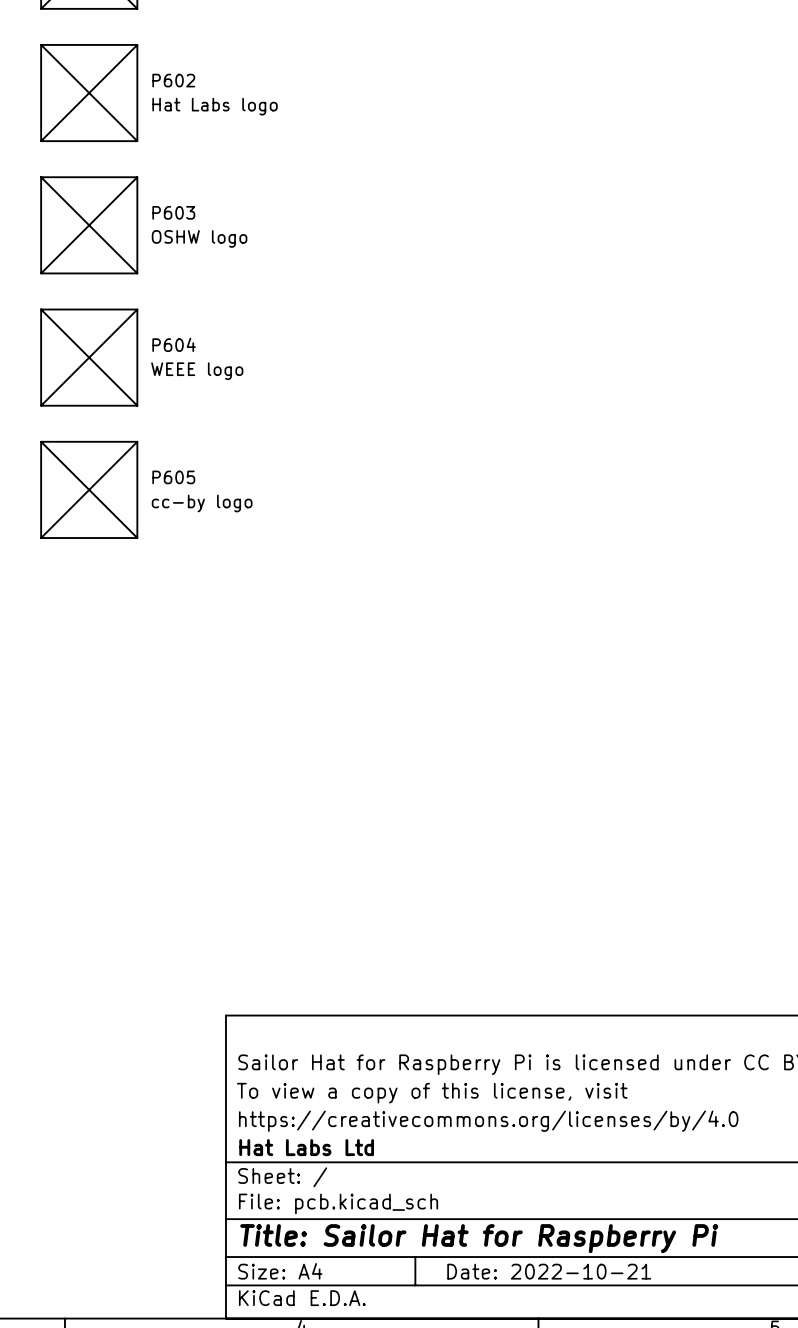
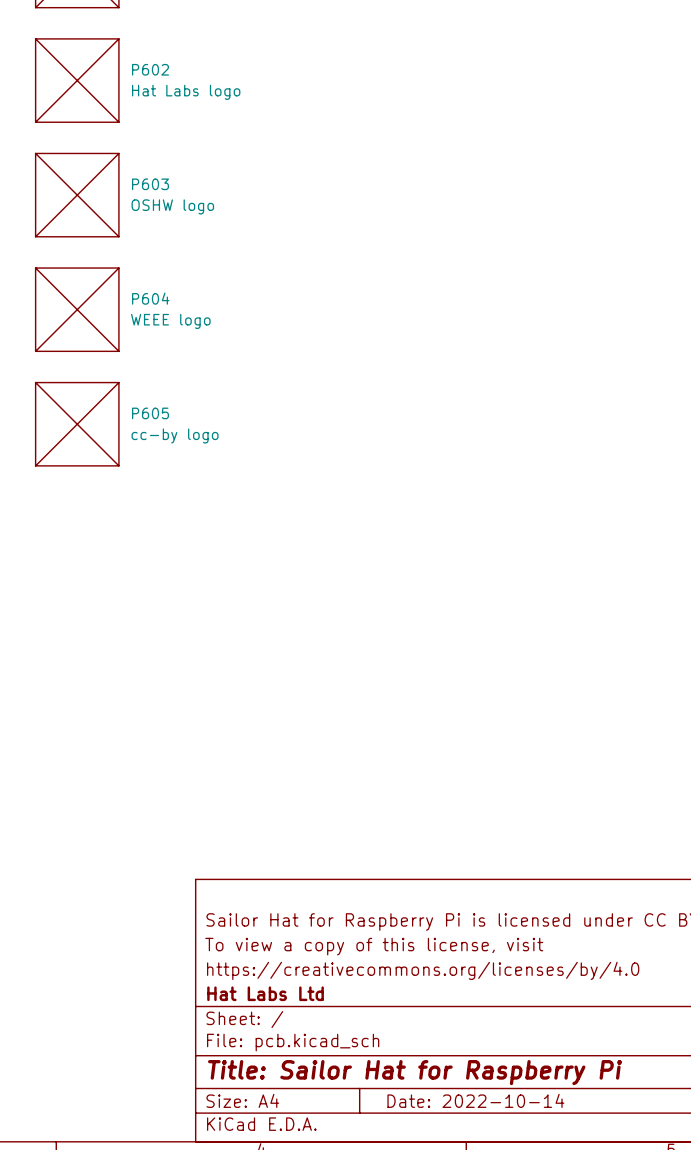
title block: Date: 2022-10-21 (549, 1271) -> Date: 2022-10-14 (475, 1100)

